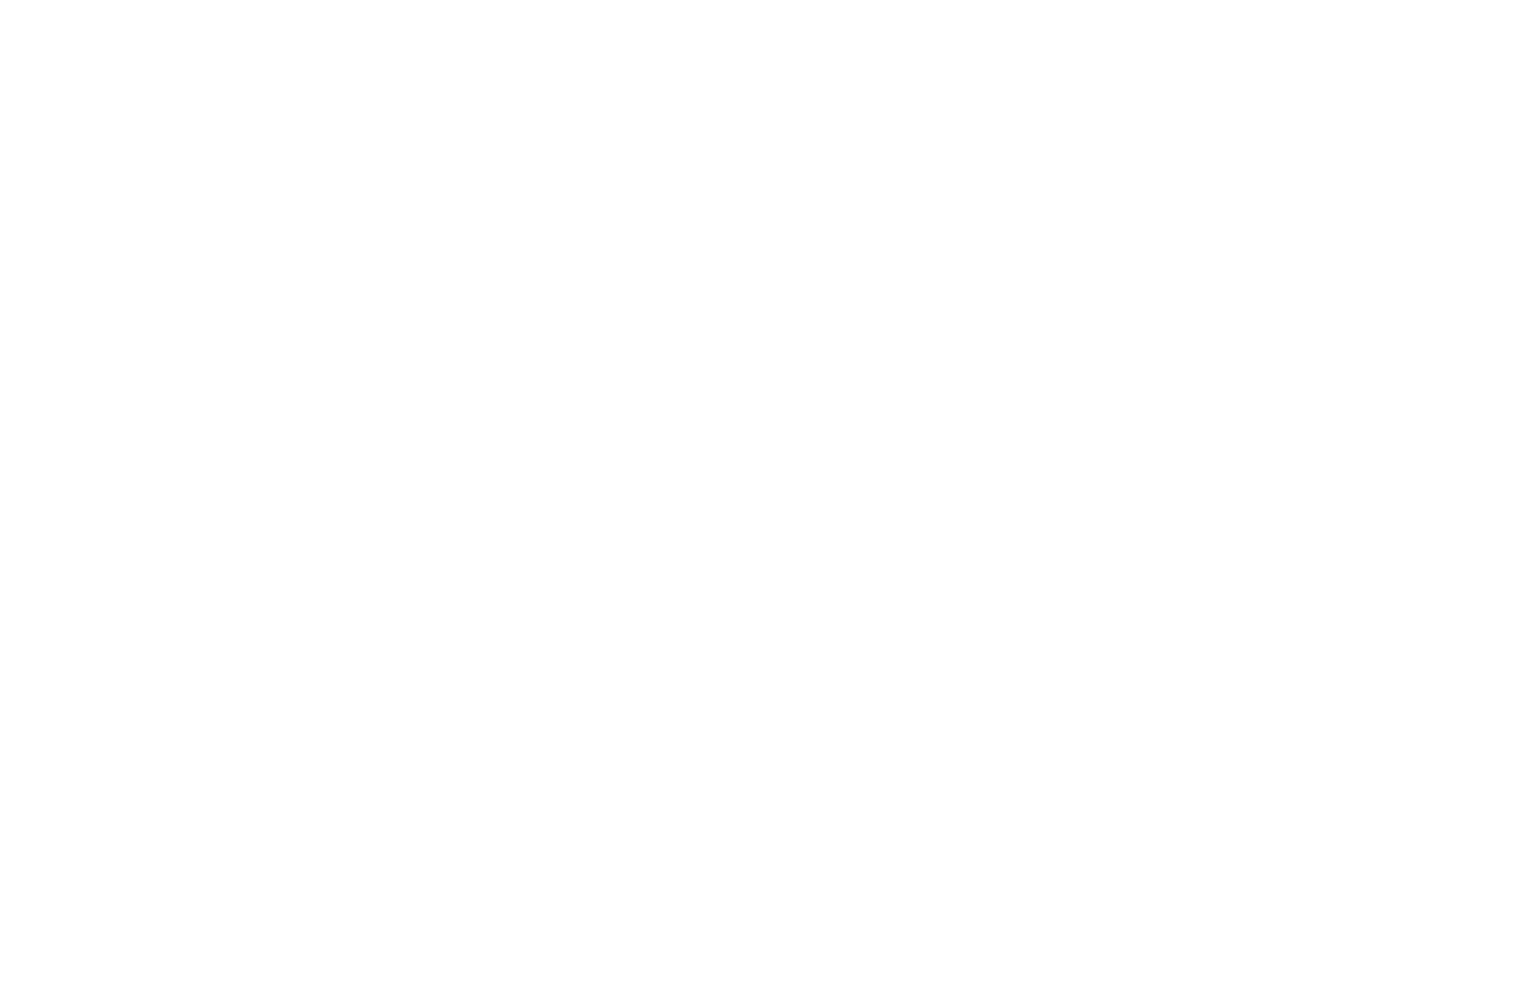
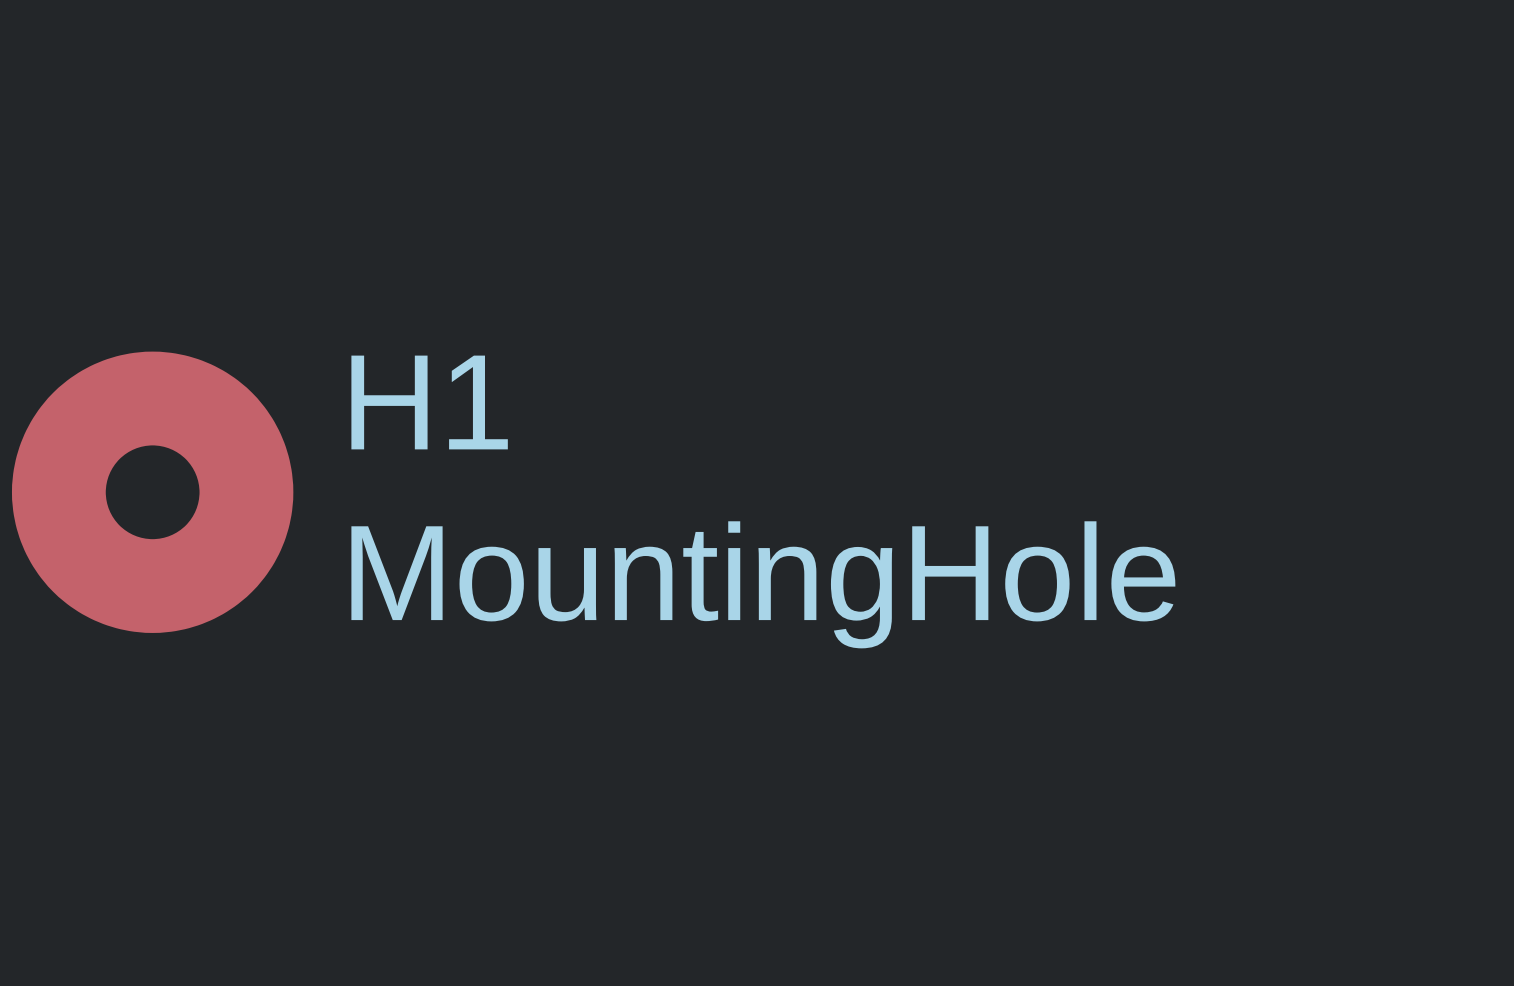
H1: none -> MountingHole (152, 492)

